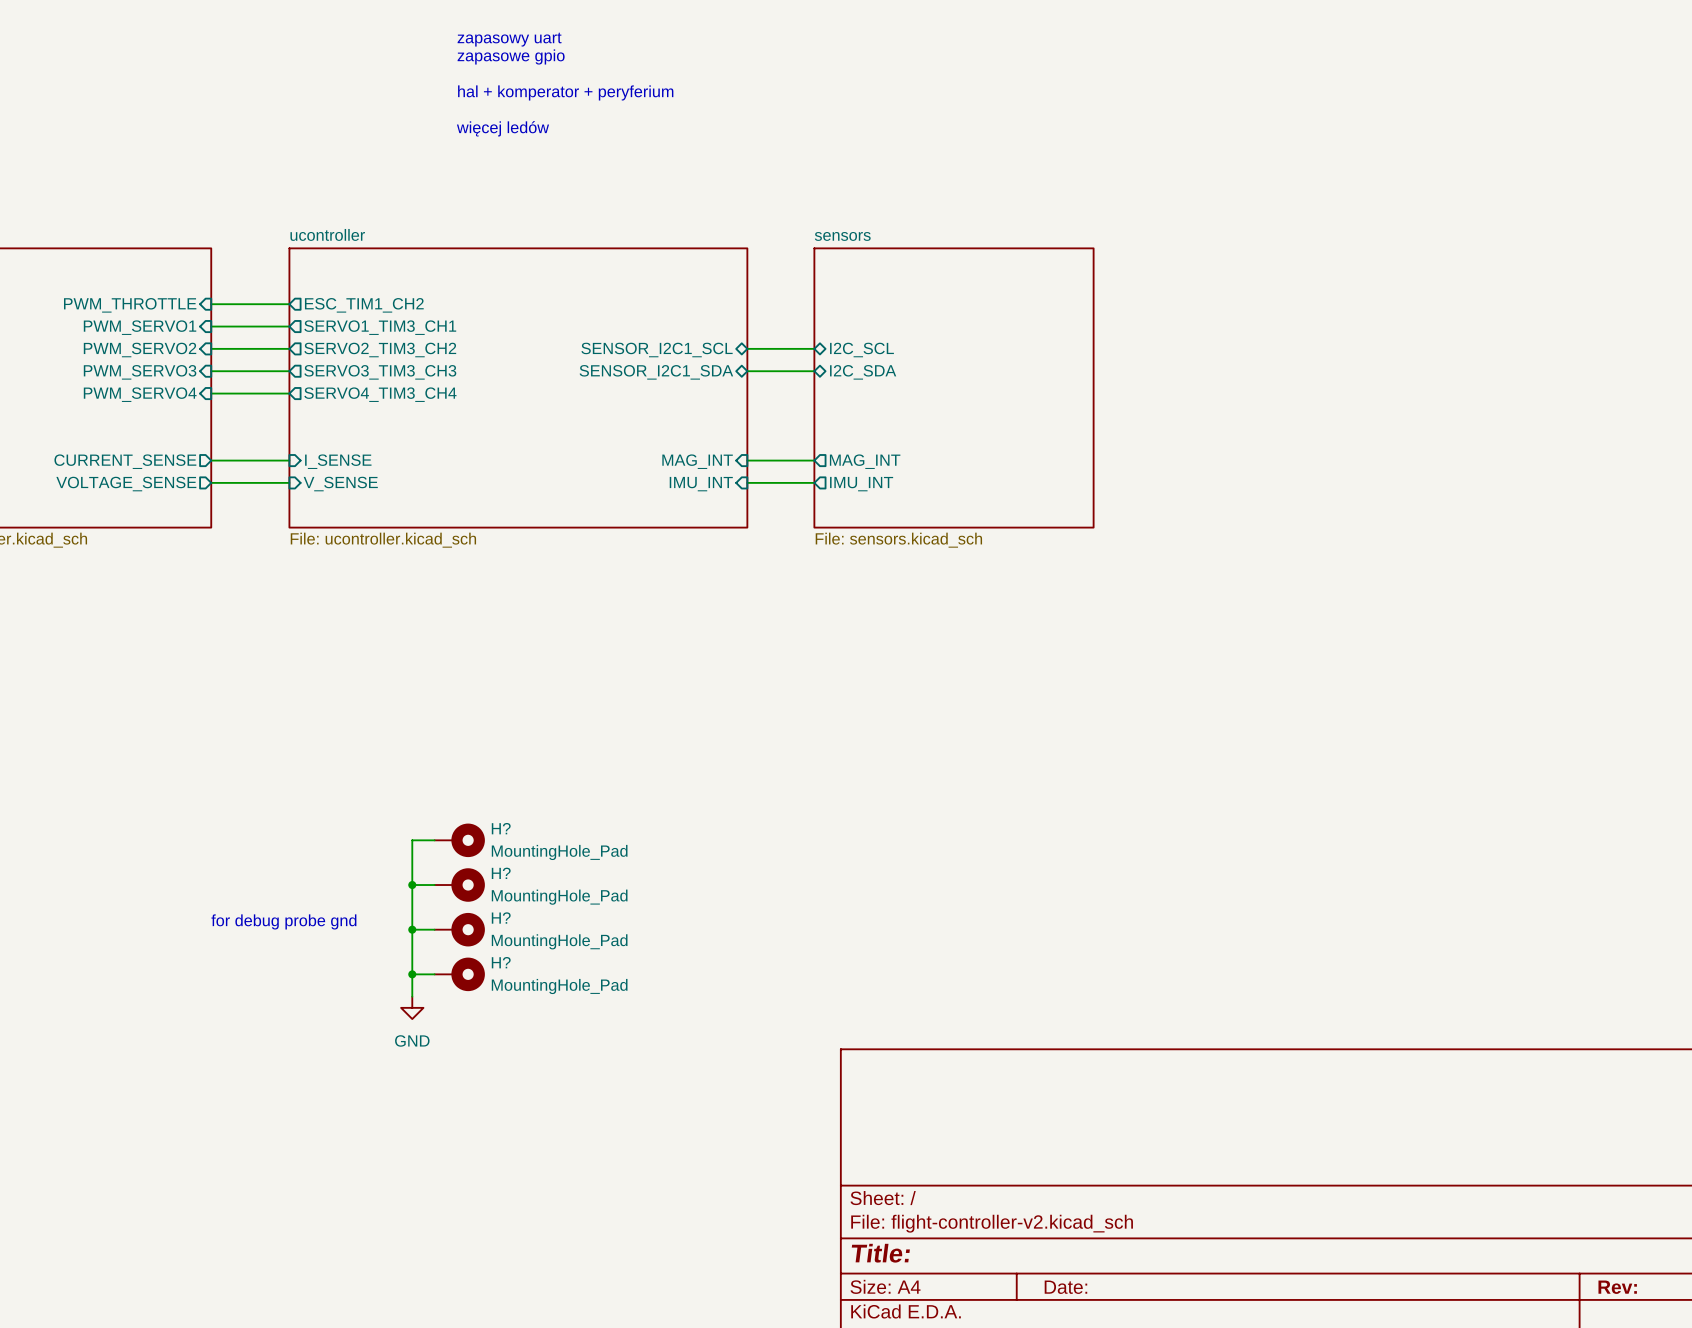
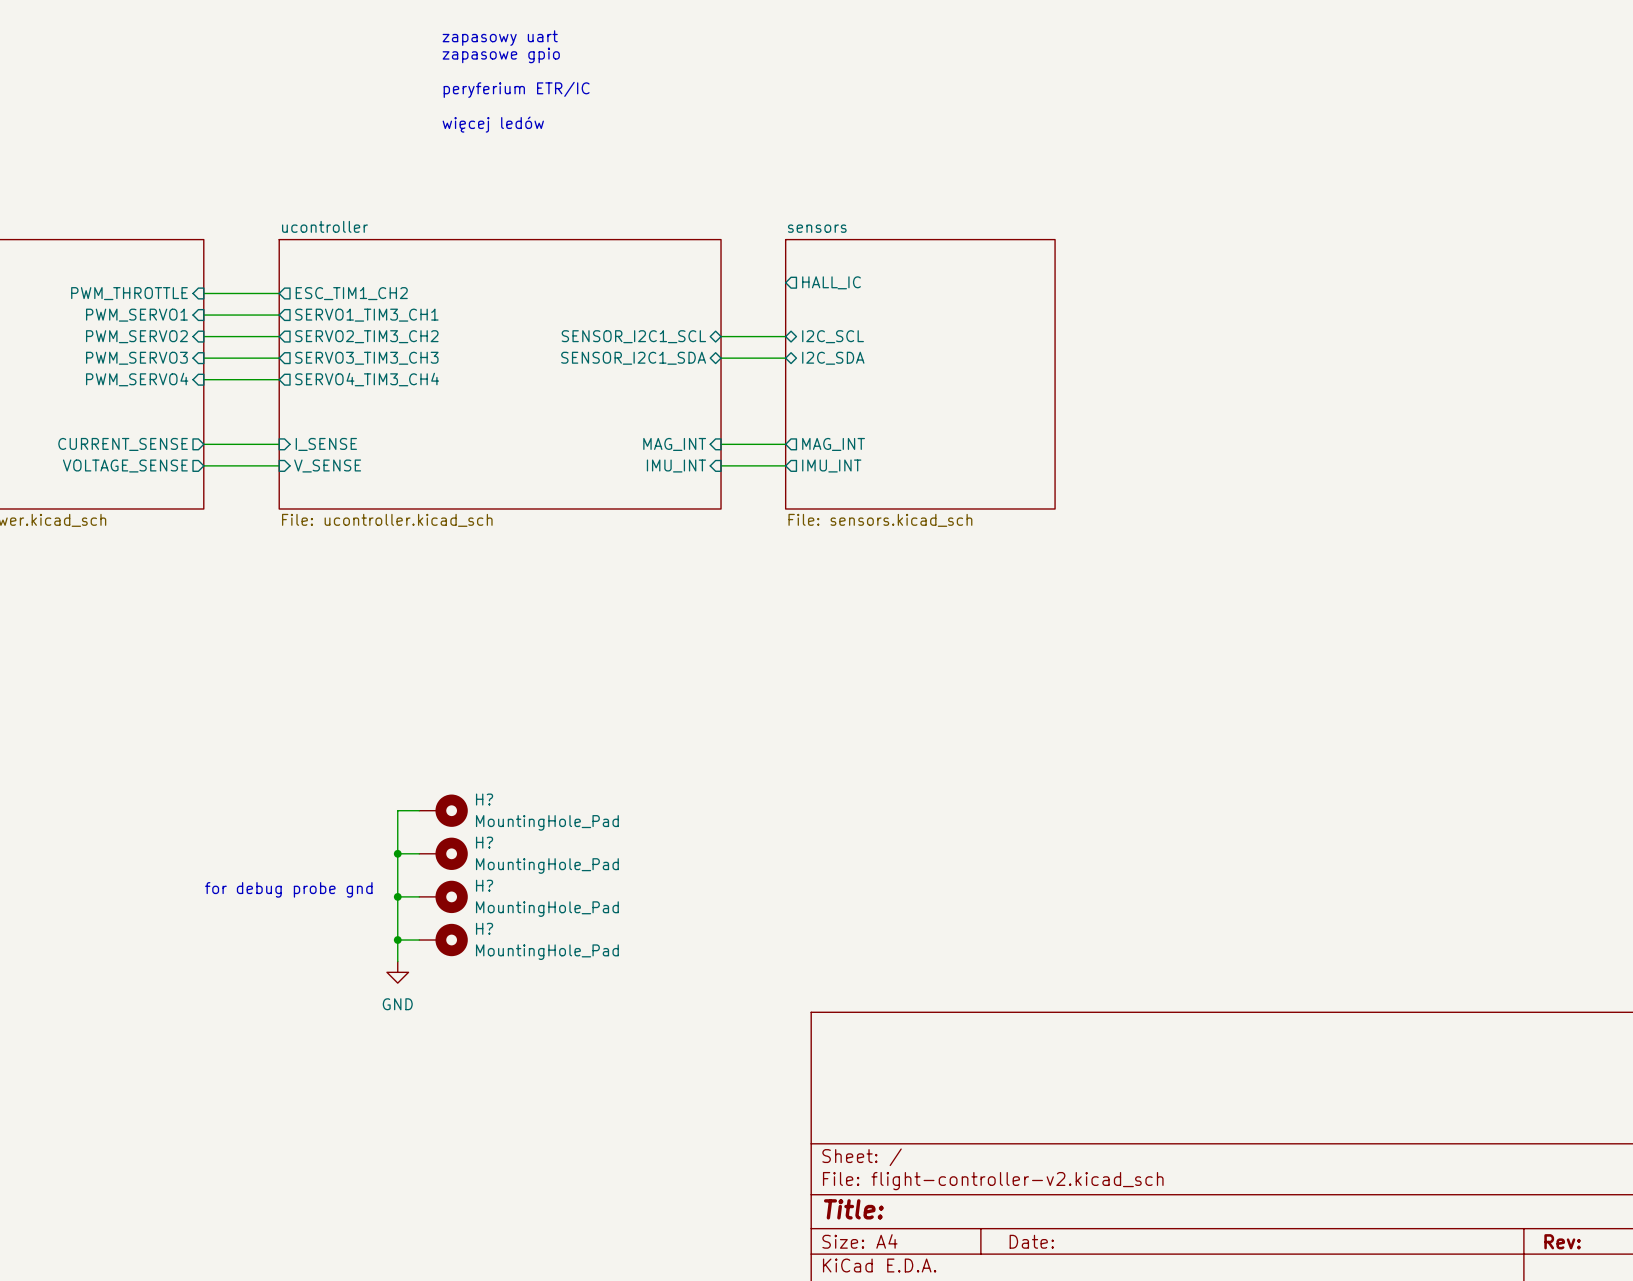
text: hal + komperator + peryferium (565, 92) -> peryferium ETR/IC (516, 89)
sheet pin: none -> HALL_IC (831, 282)

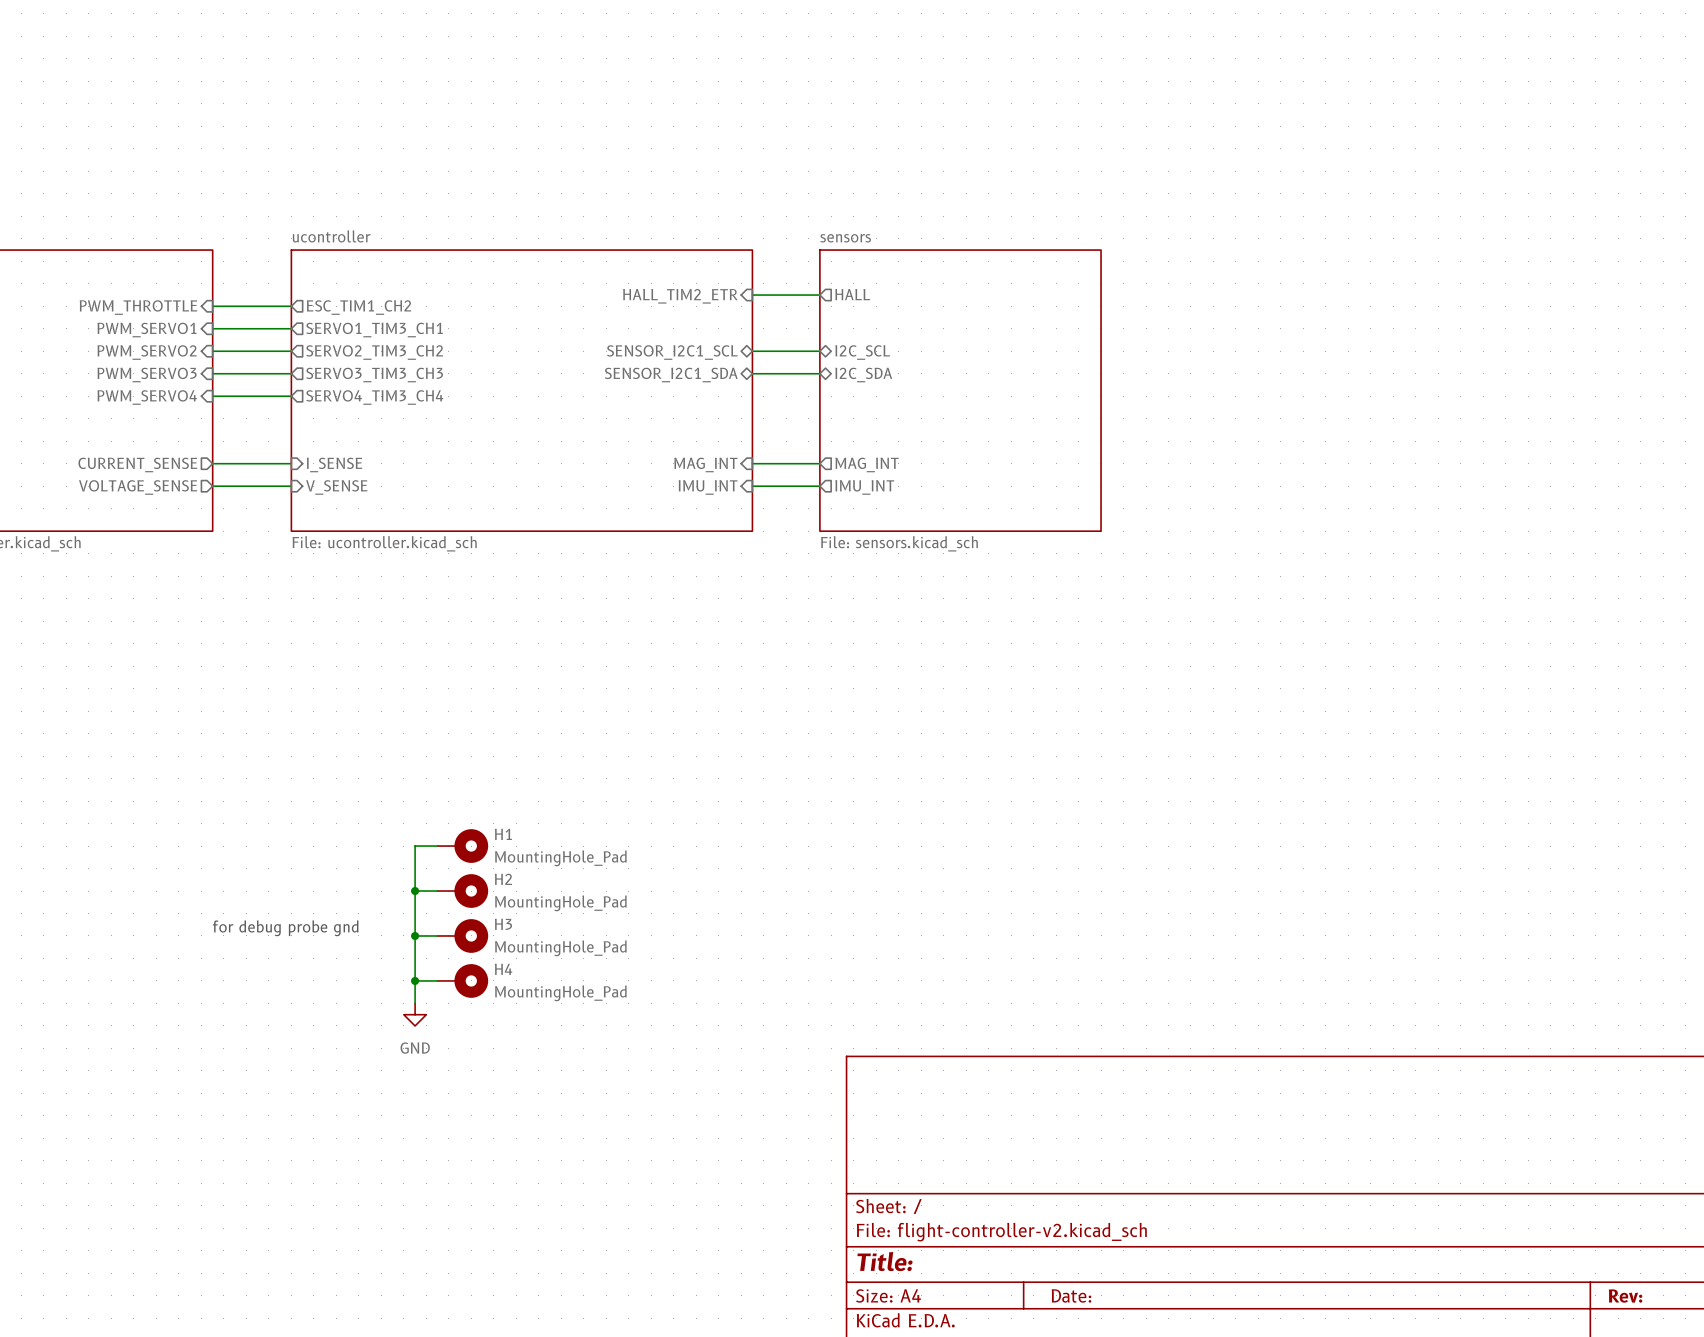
text: zapasowy uart (500, 38) -> none
text: zapasowe gpio (501, 55) -> none
text: peryferium ETR/IC (516, 89) -> none
text: więcej ledów (493, 124) -> none
sheet pin: none -> HALL_TIM2_ETR (680, 296)
wire: none -> (752, 295) (819, 295)
sheet pin: HALL_IC (831, 282) -> HALL (852, 294)
H? name: H? (484, 799) -> H1 (503, 834)
H? name: H? (484, 842) -> H2 (503, 879)
H? name: H? (484, 885) -> H3 (503, 924)
H? name: H? (484, 928) -> H4 (503, 969)

